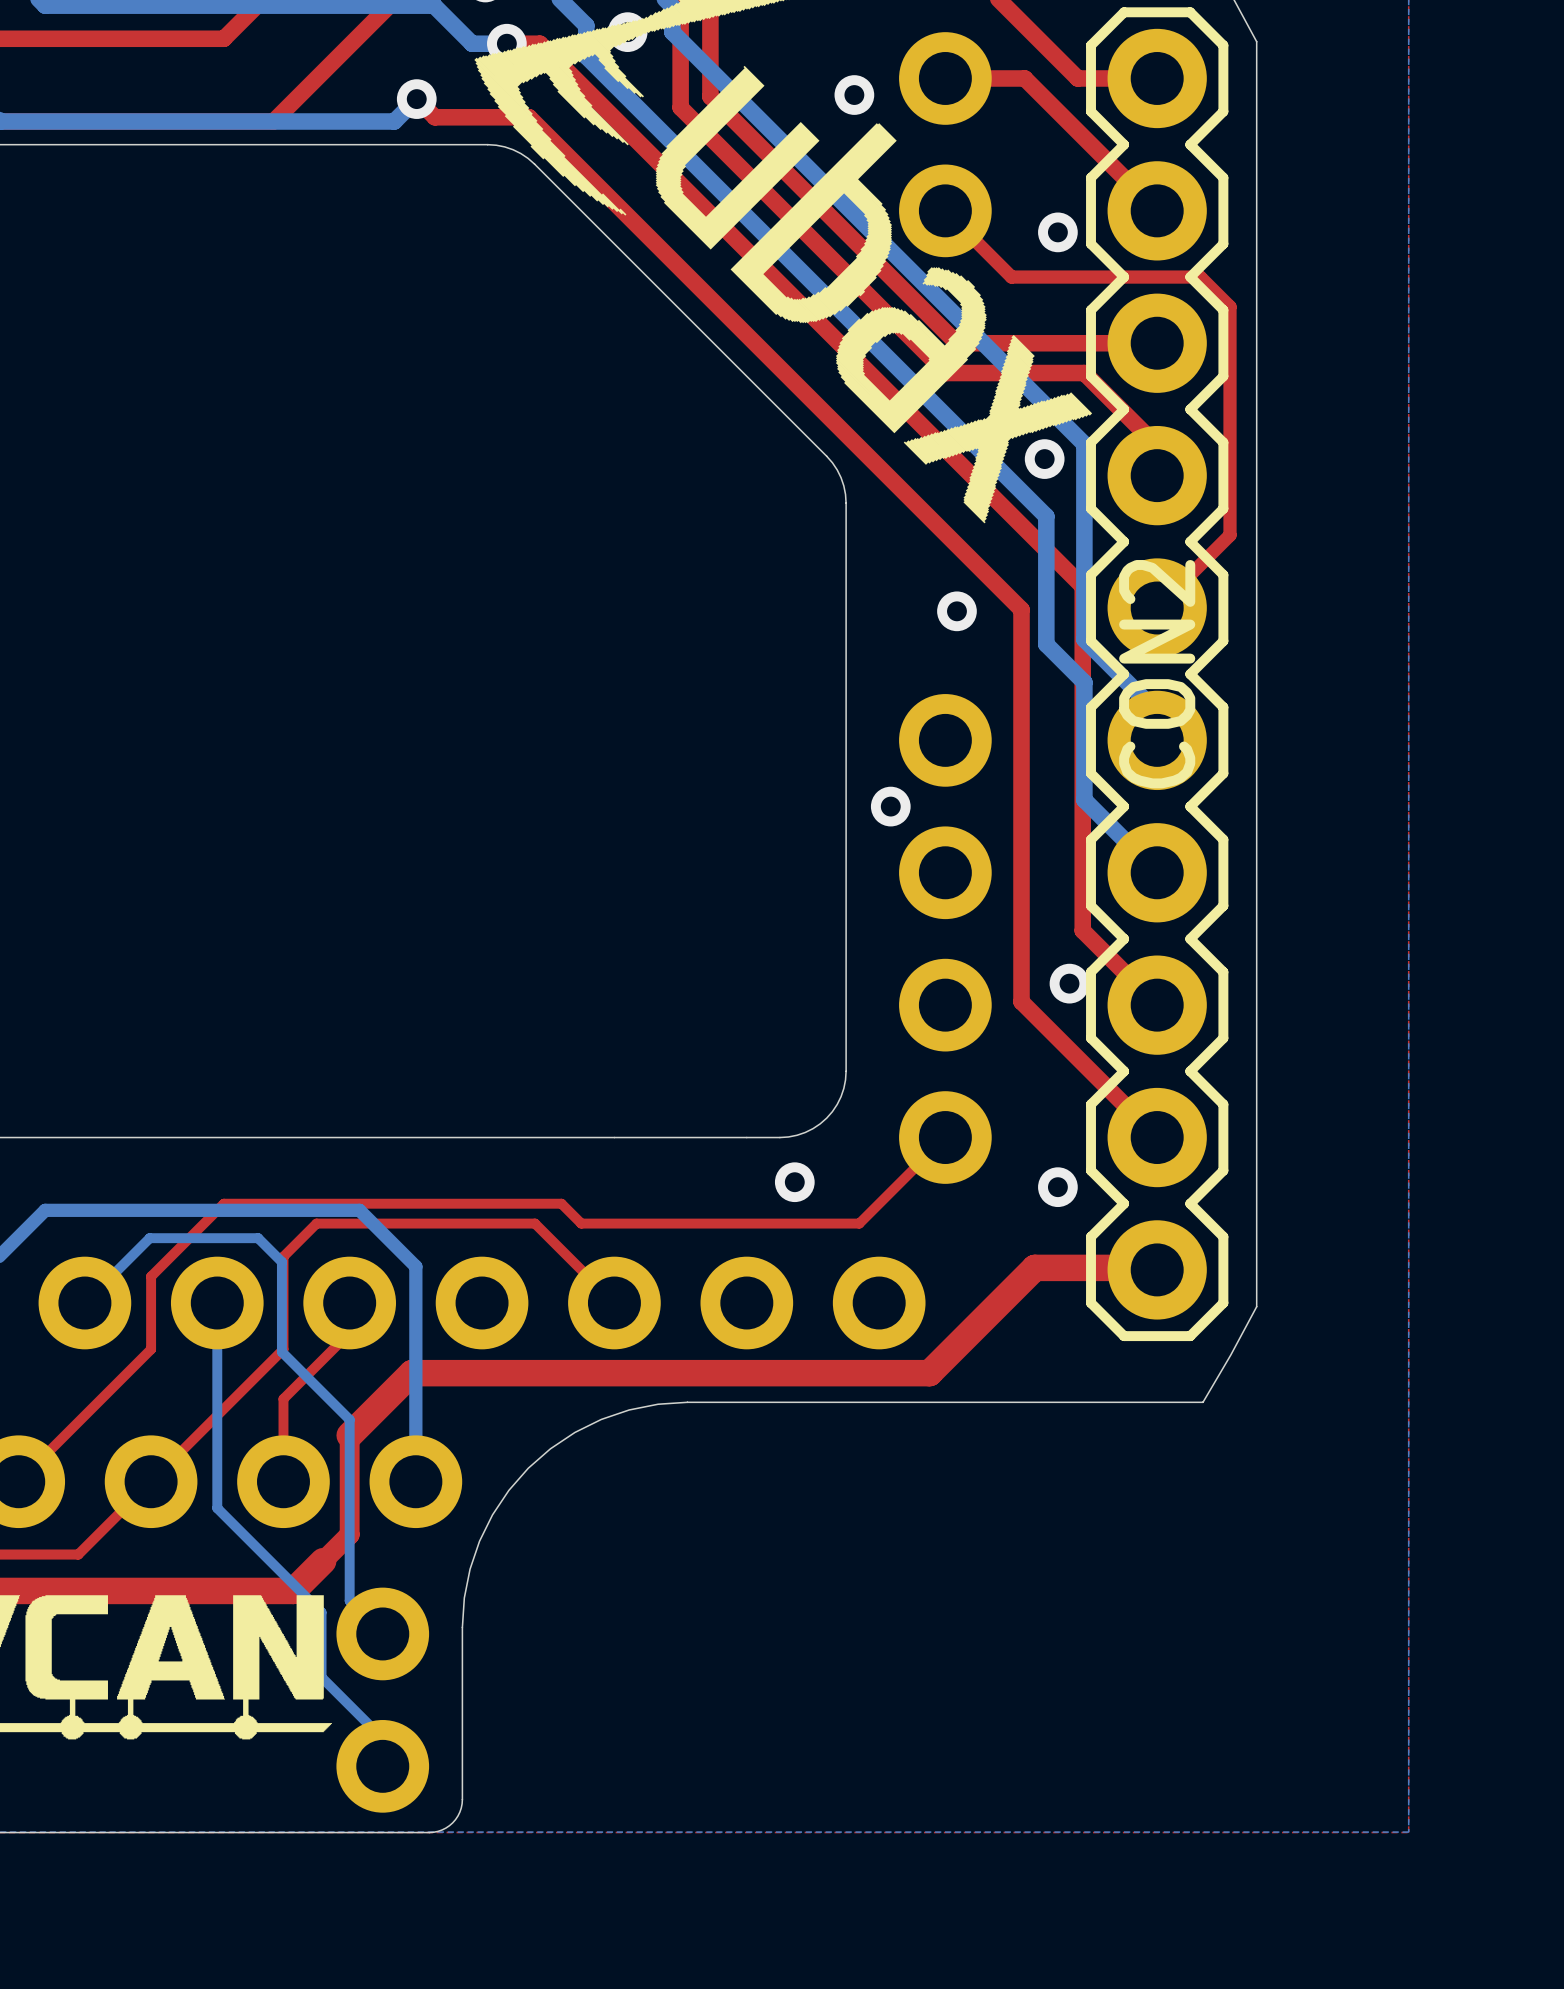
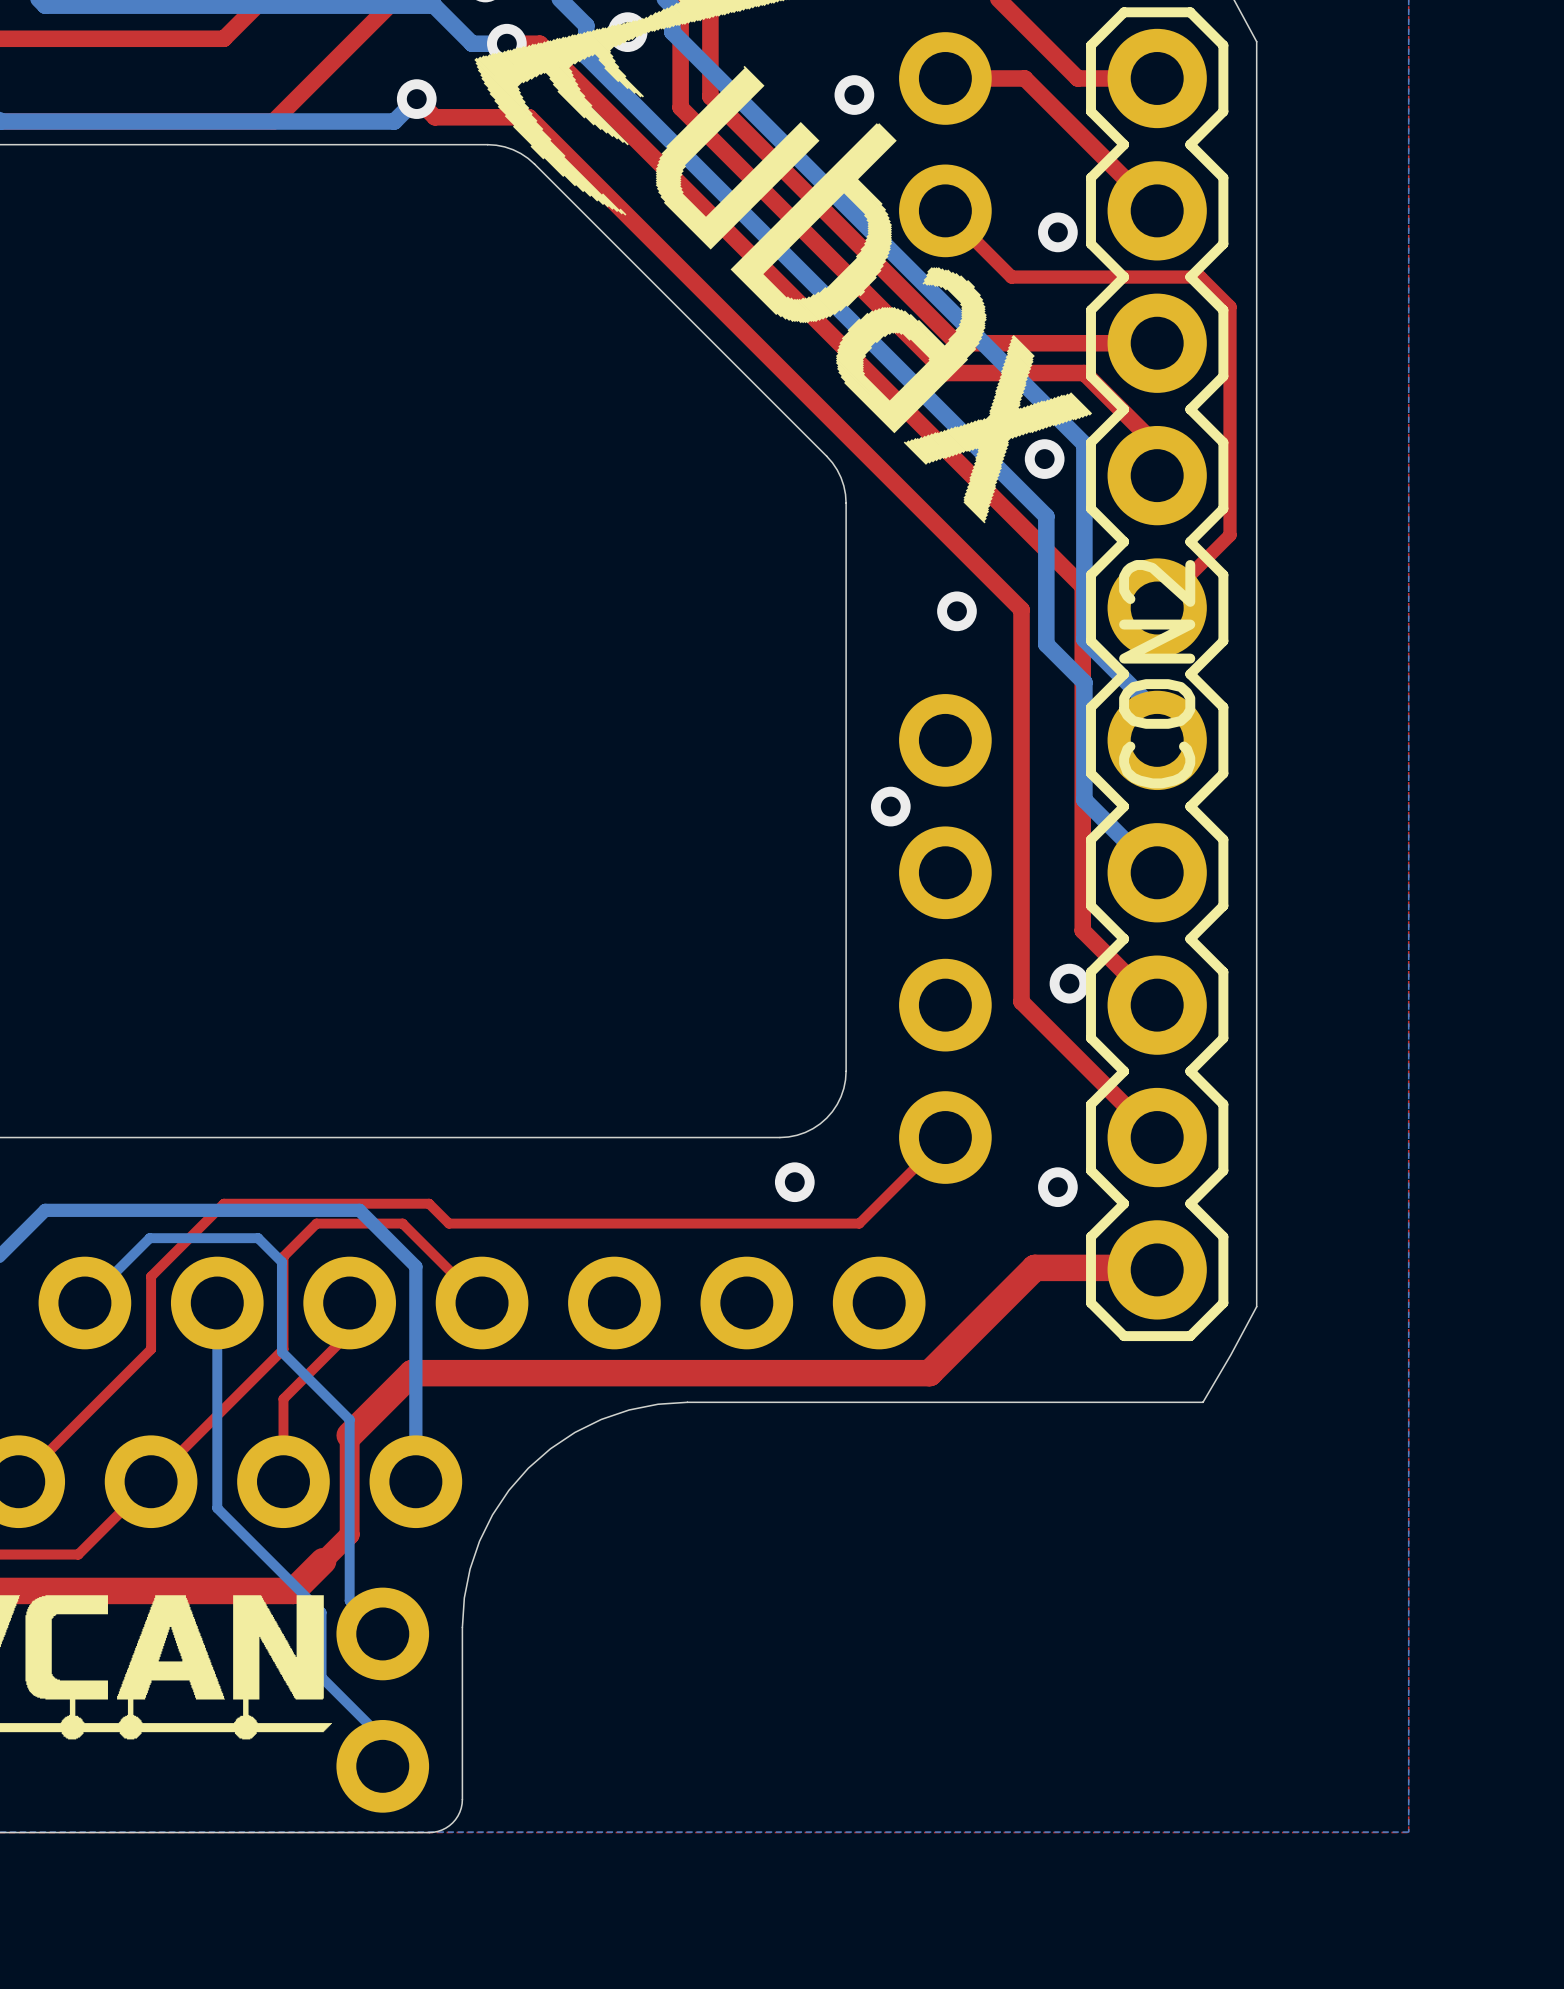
top track: (429, 1203) (561, 1203) (581, 1223) -> none
top track: none -> (402, 1223) (482, 1303)
top track: (448, 1223) (402, 1223) -> (448, 1223) (429, 1203)
top track: (535, 1223) (614, 1303) -> (535, 1223) (581, 1223)

